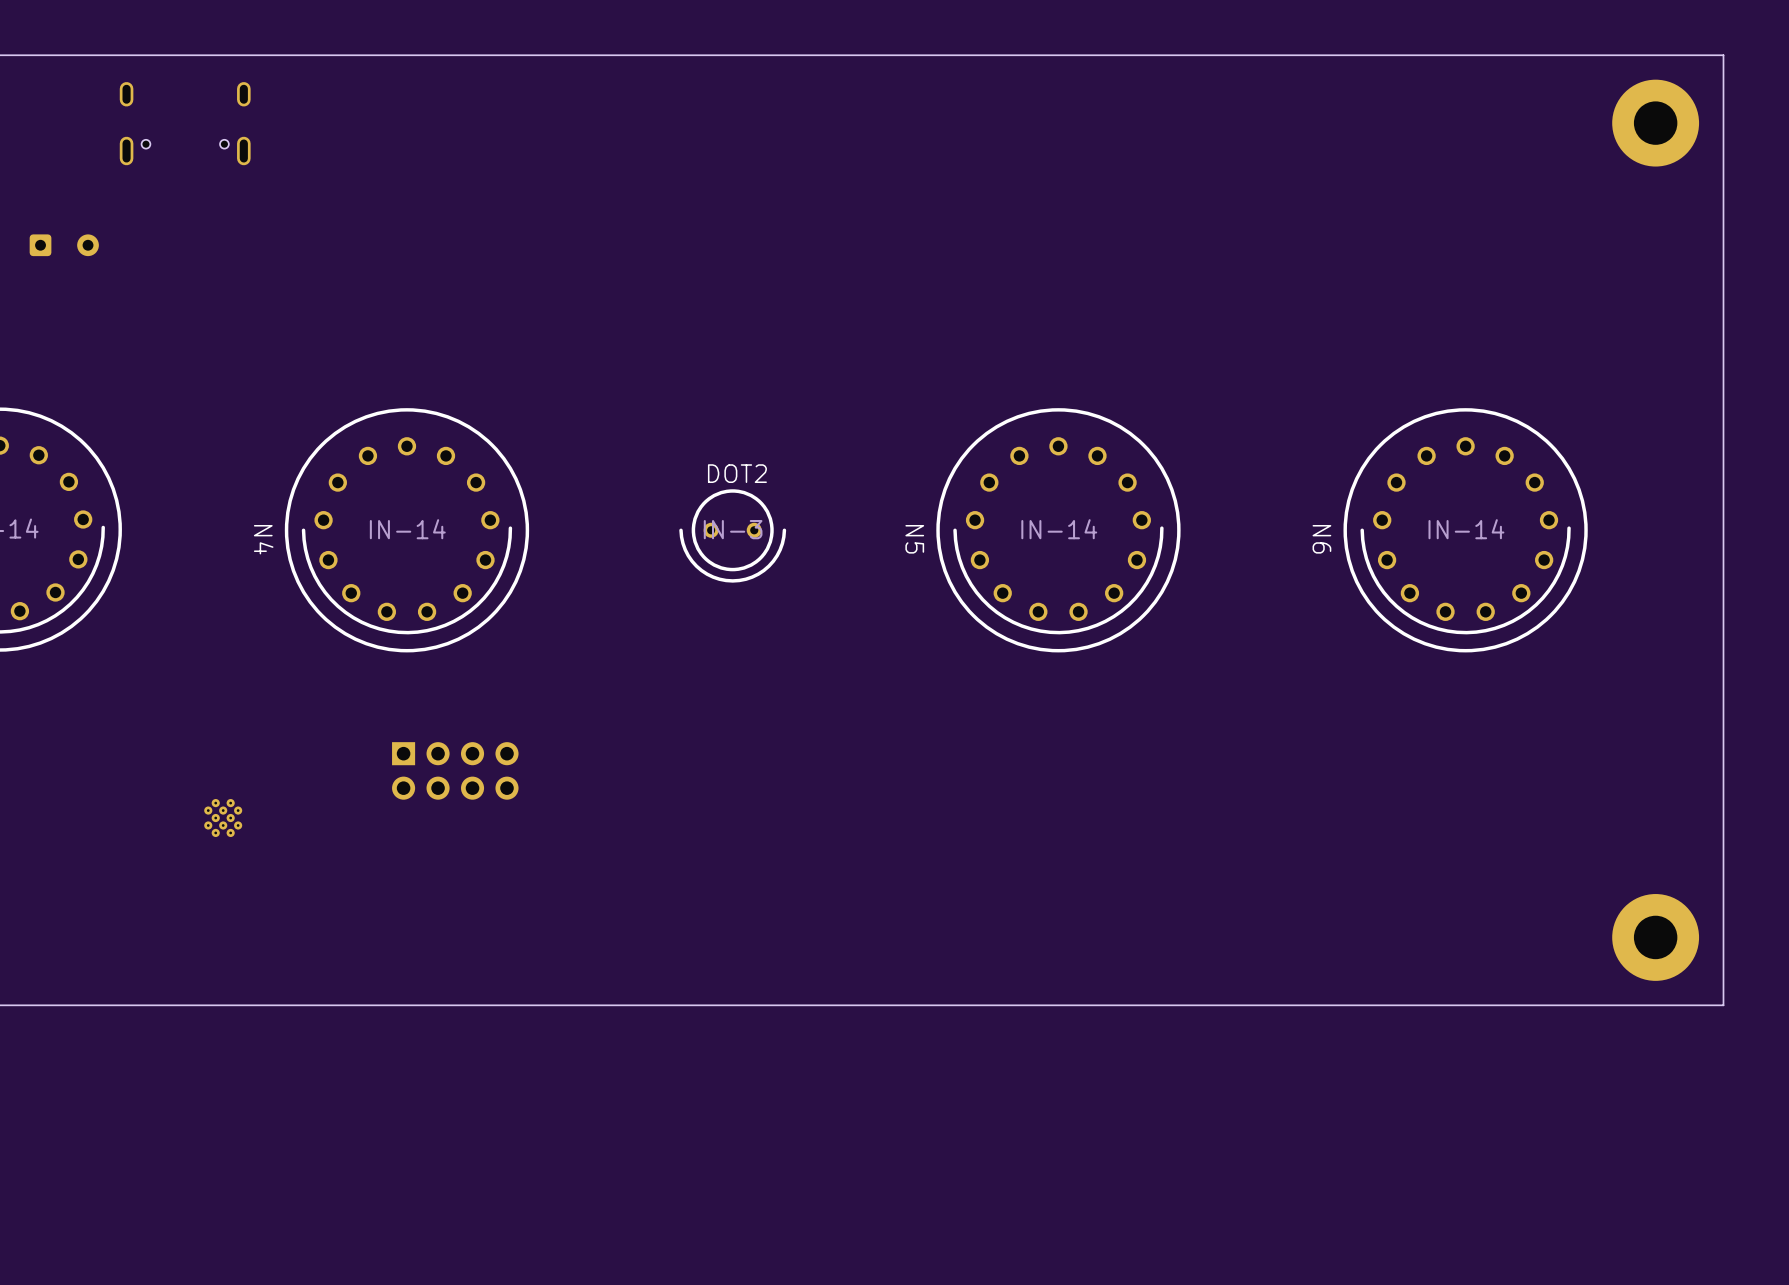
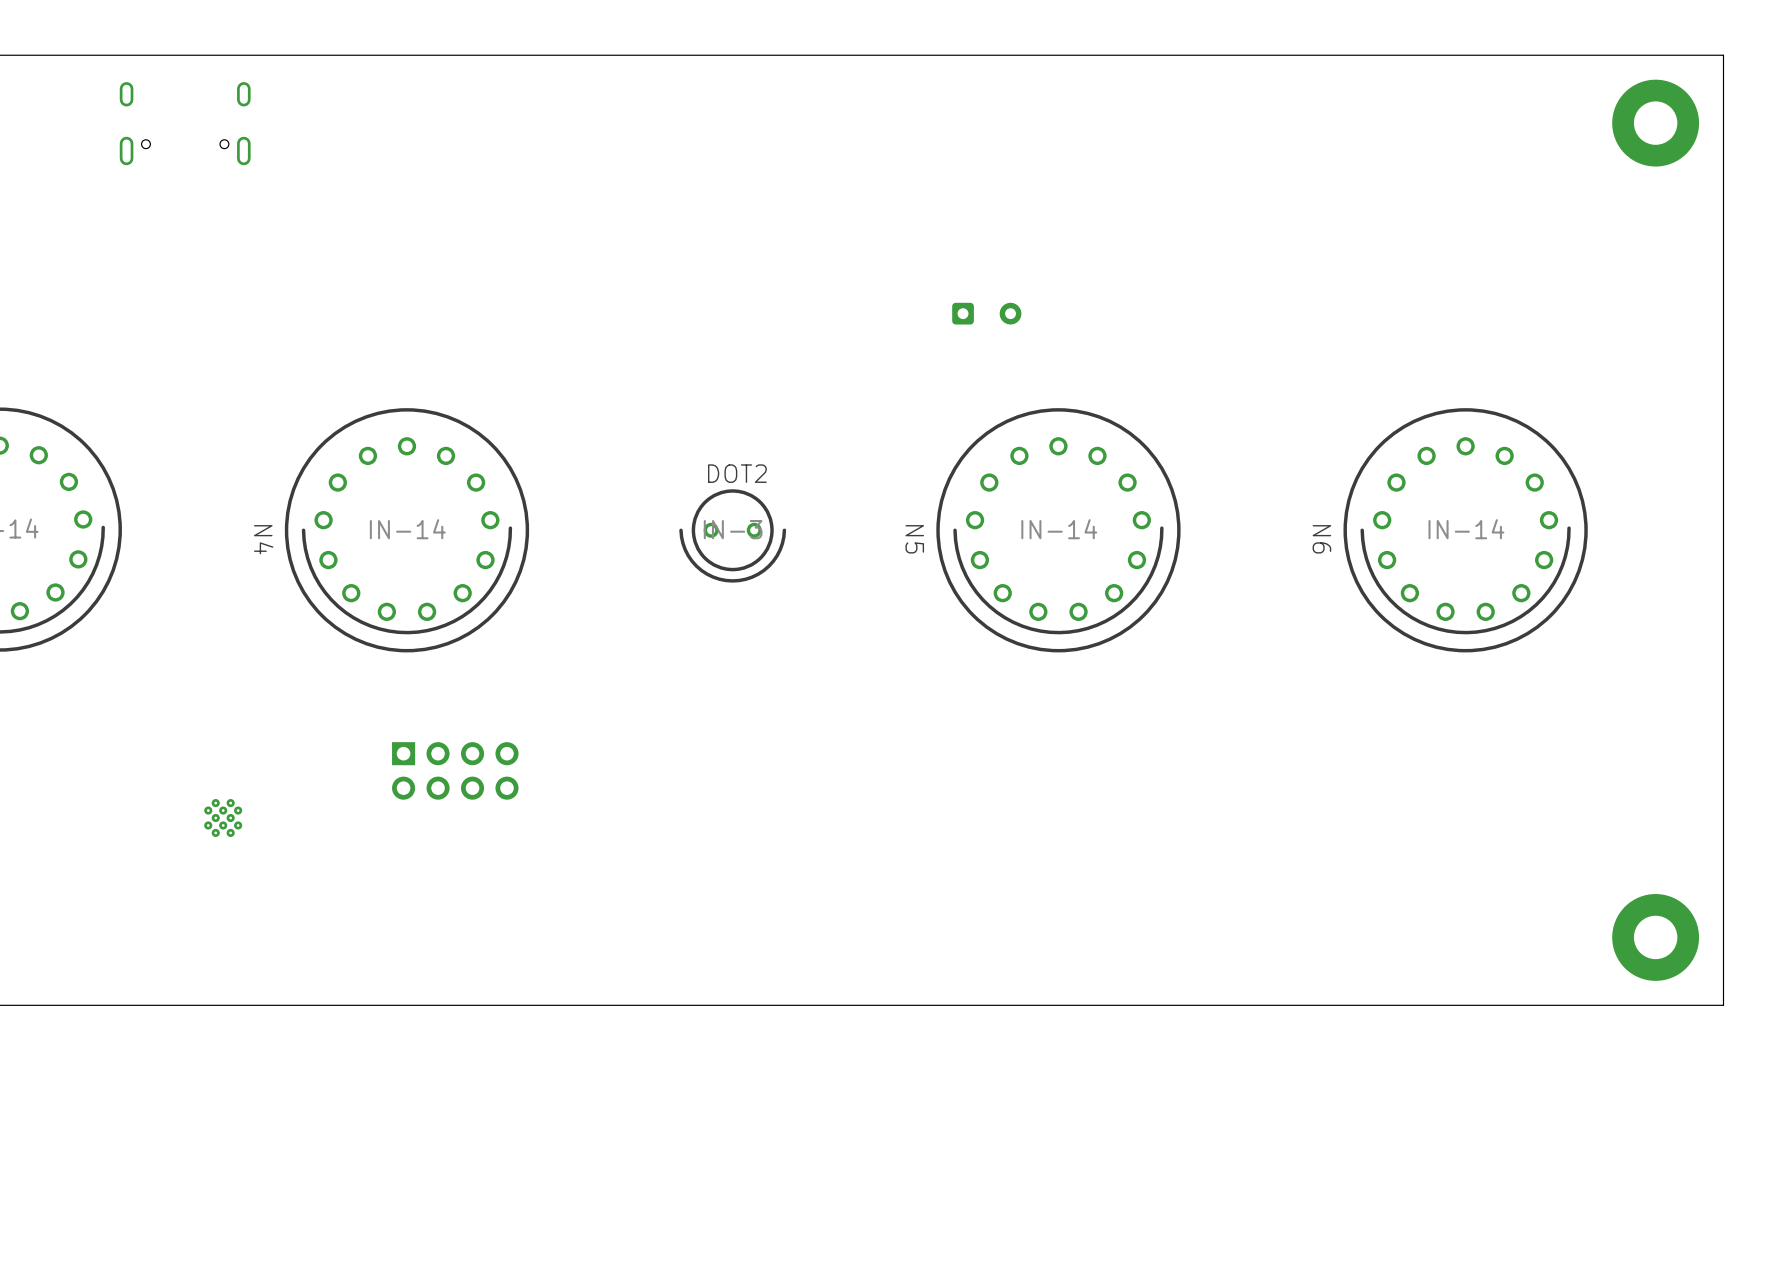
part: (64, 245) -> none
part: none -> (986, 313)

